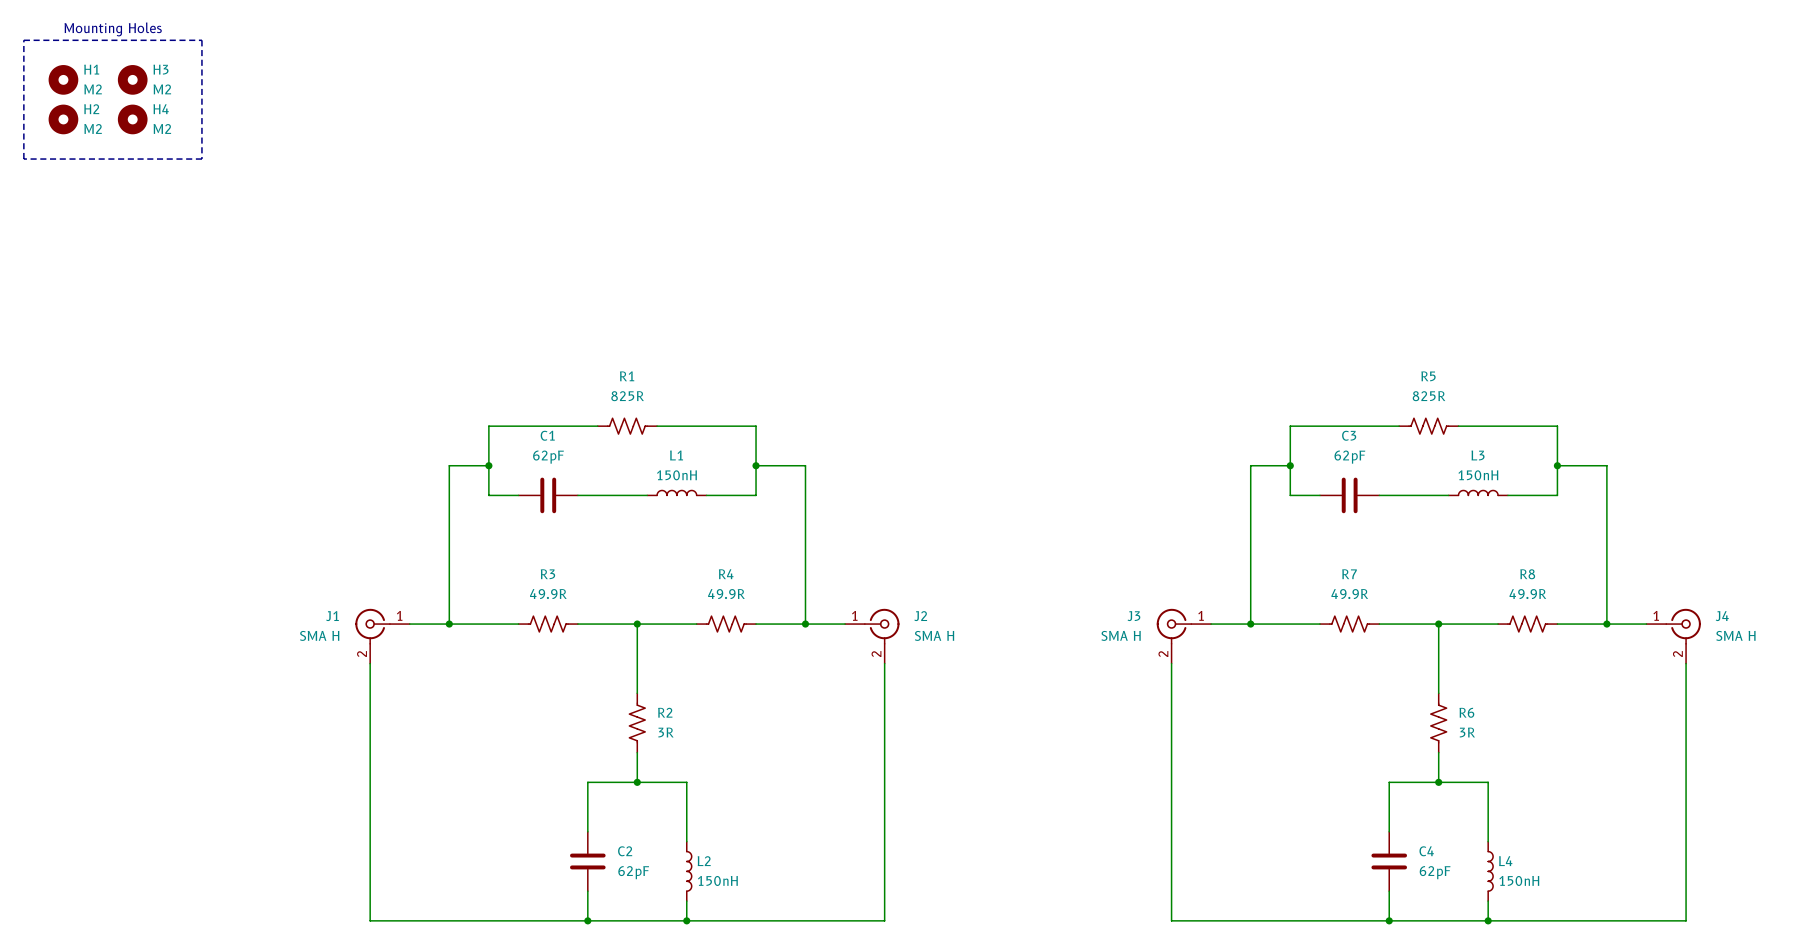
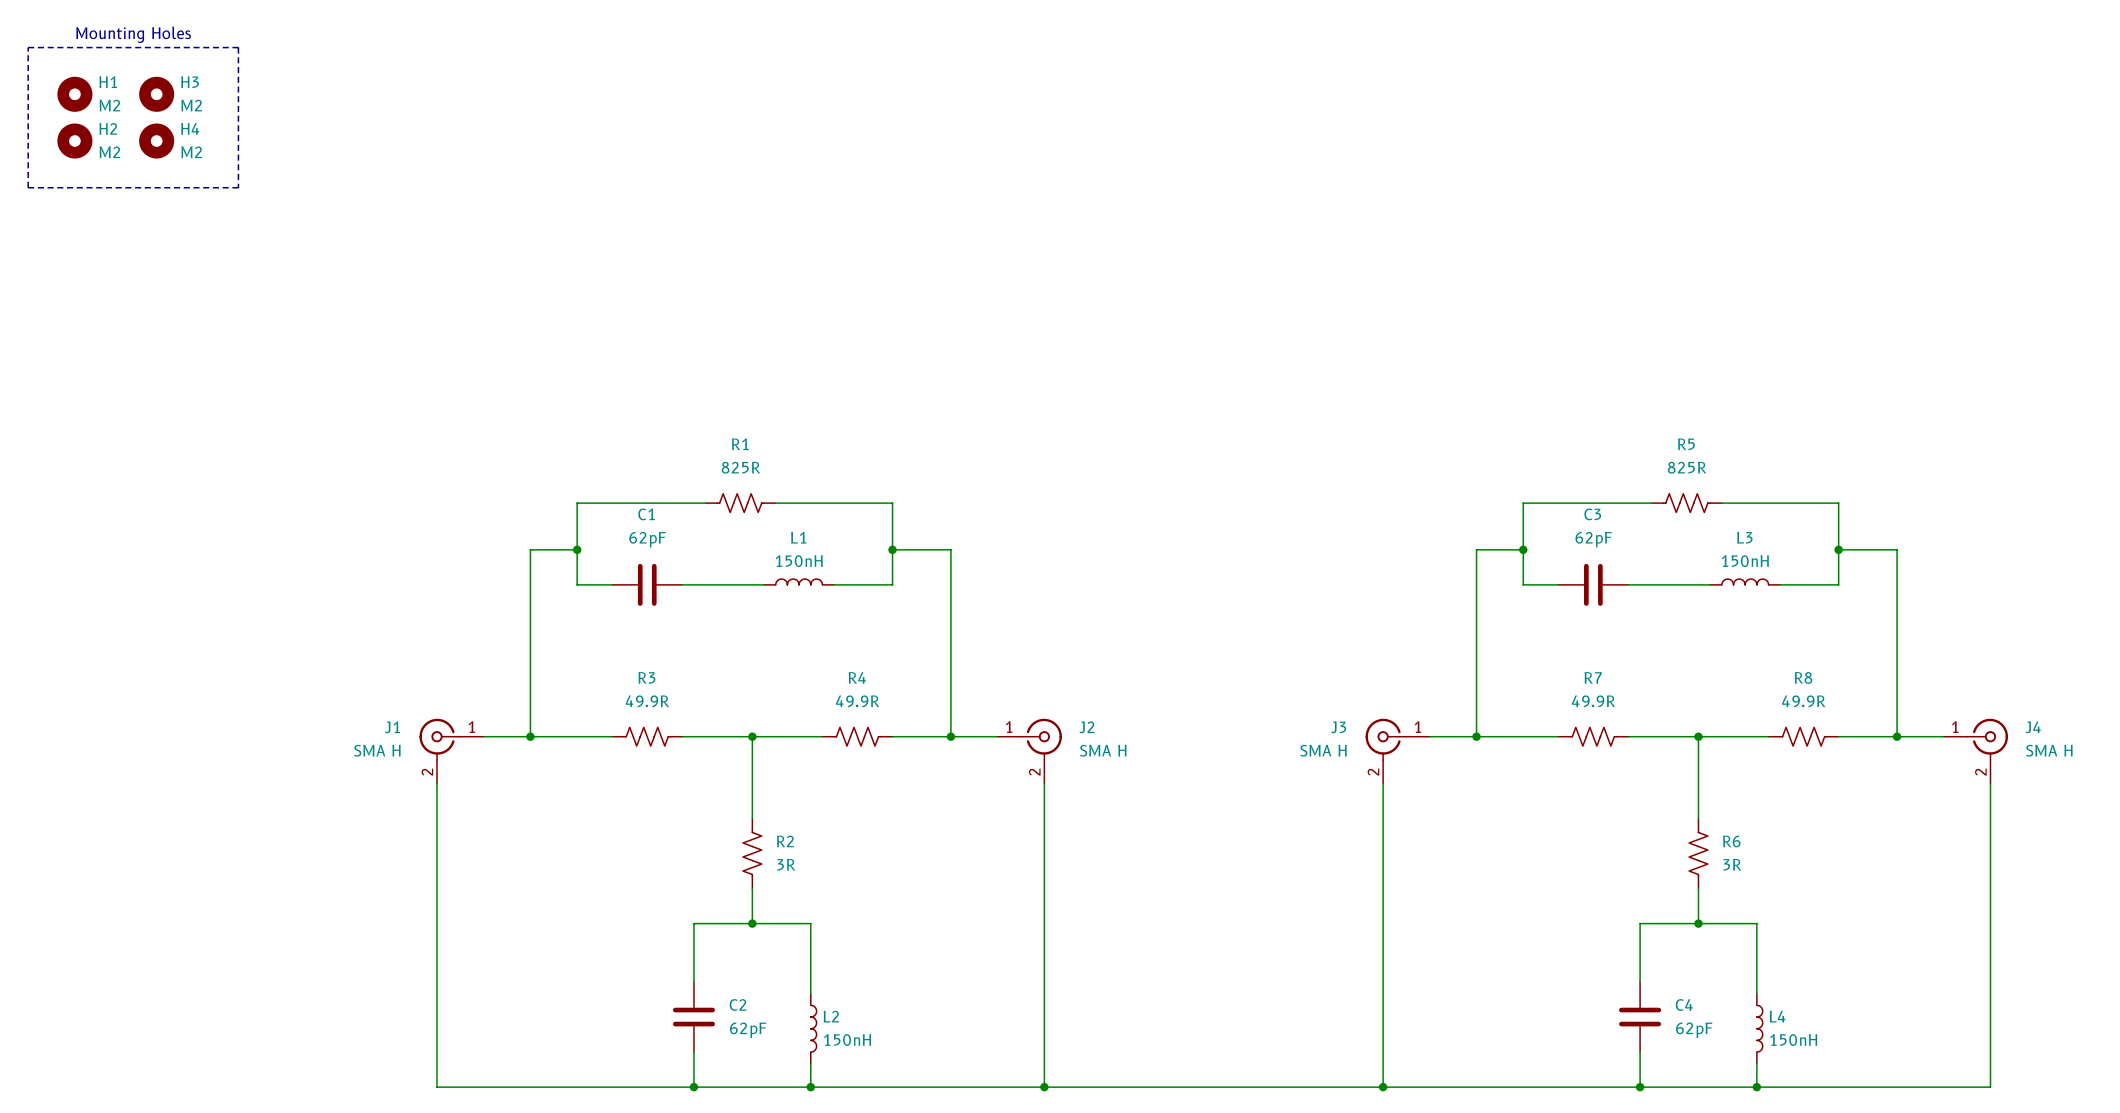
wire: none -> (1044, 1087) (1383, 1087)
junction: none -> (1044, 1087)
junction: none -> (1383, 1087)

